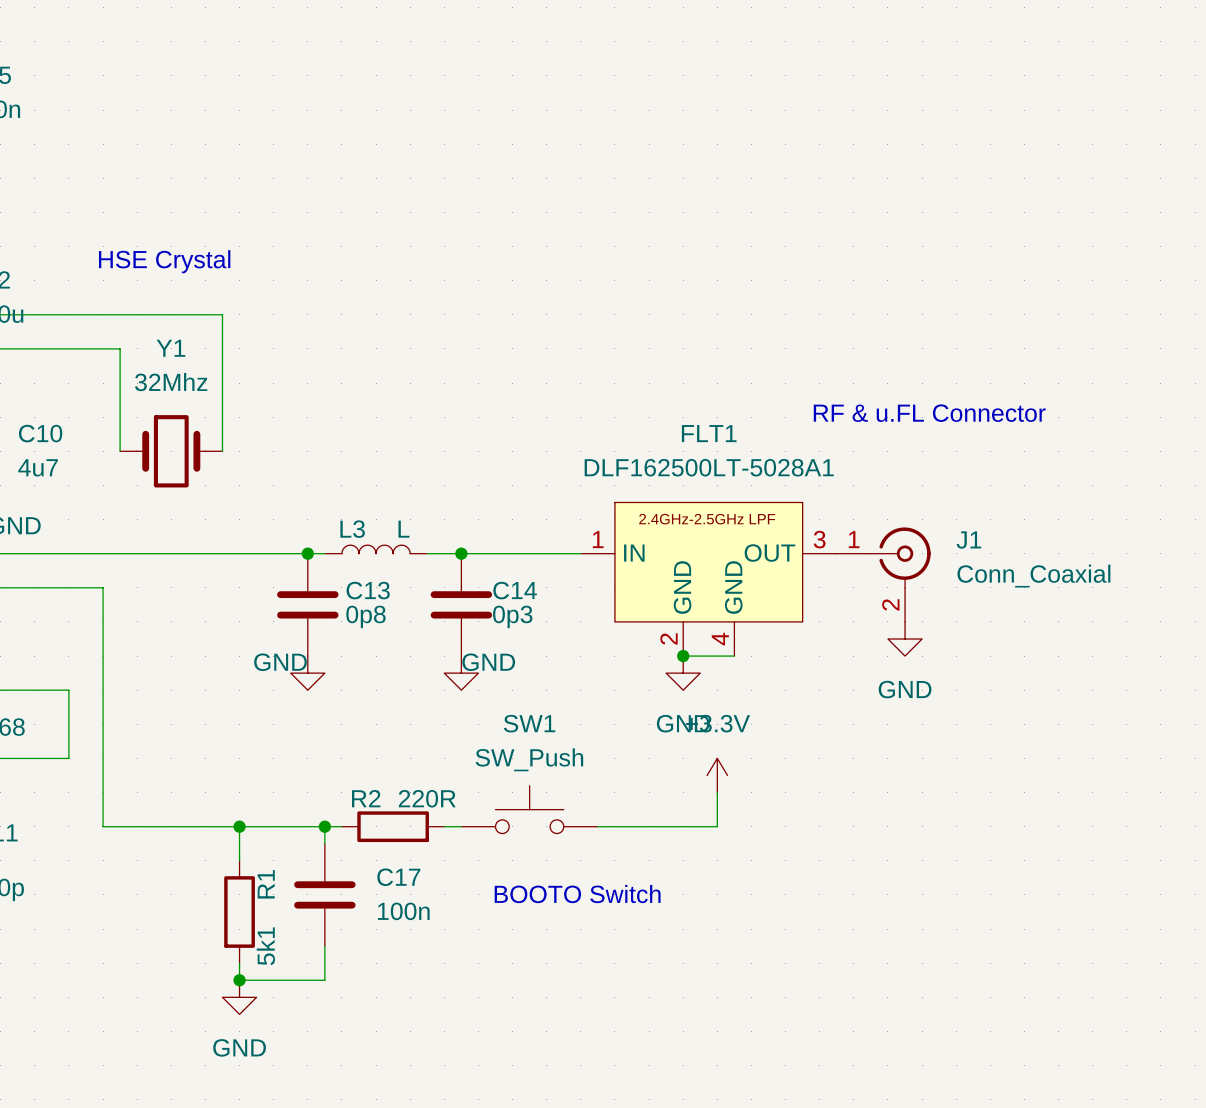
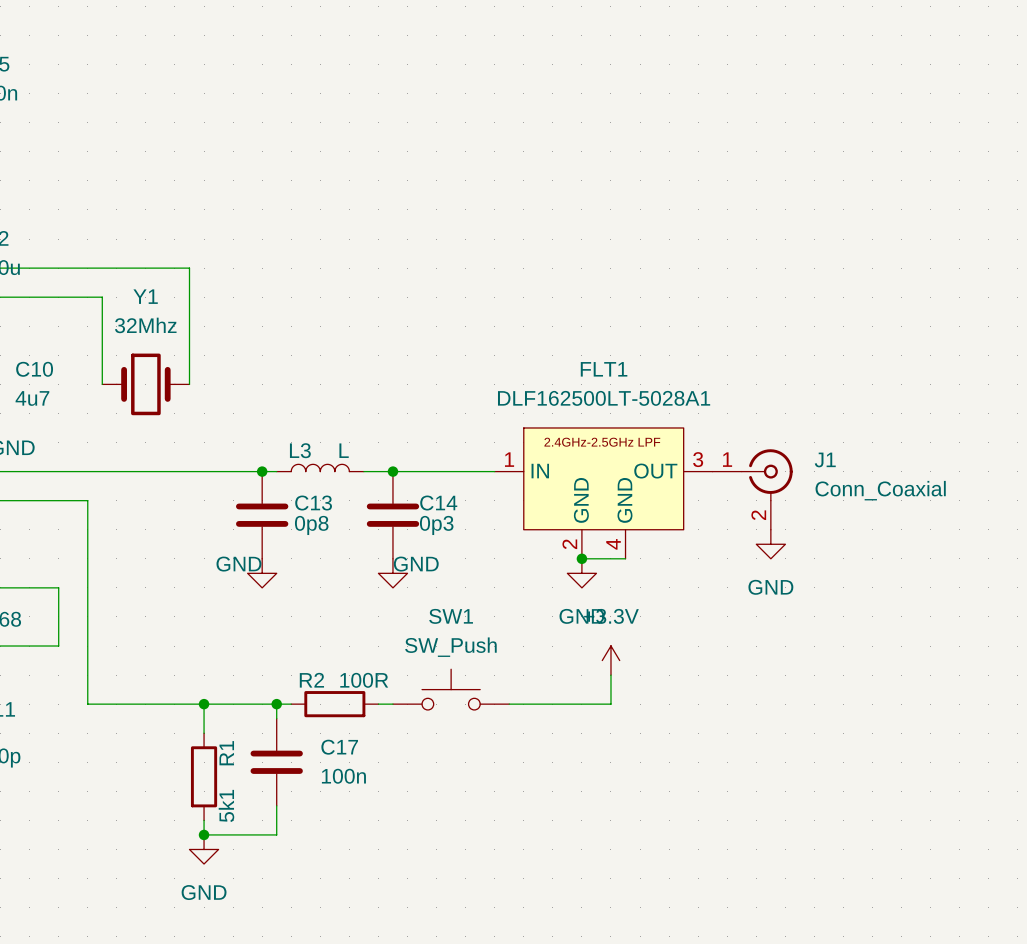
text: HSE Crystal (164, 261) -> none
text: RF & u.FL Connector (929, 413) -> none
R2 value: 220R (427, 798) -> 100R (364, 680)
text: BOOTO Switch (577, 894) -> none

